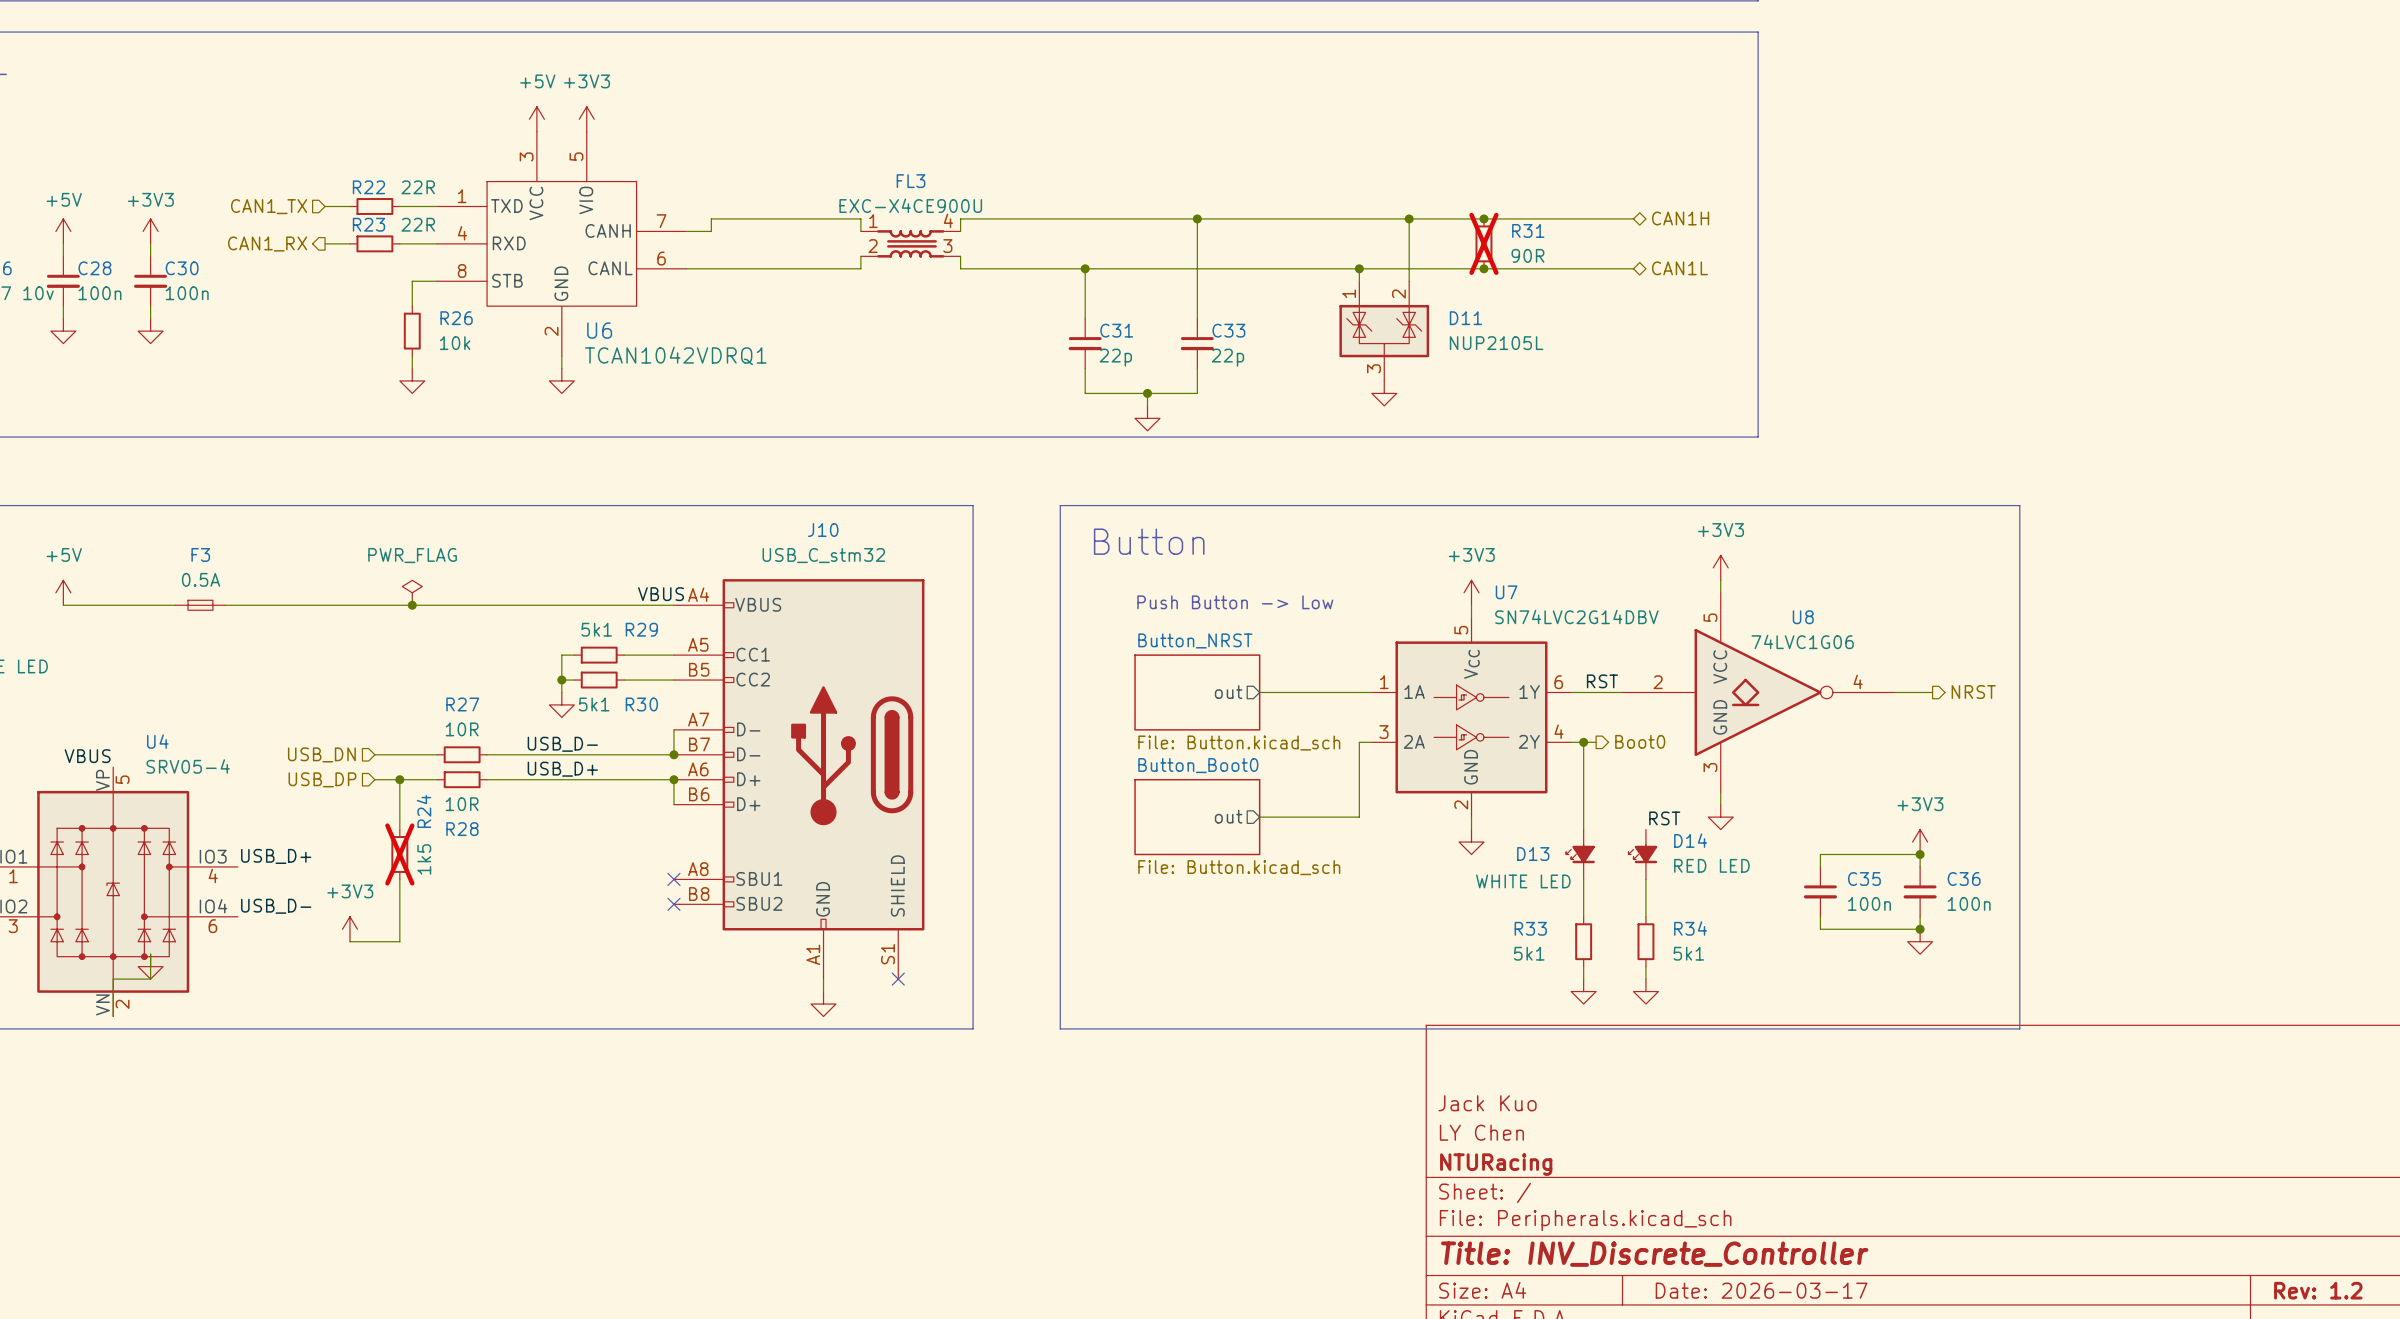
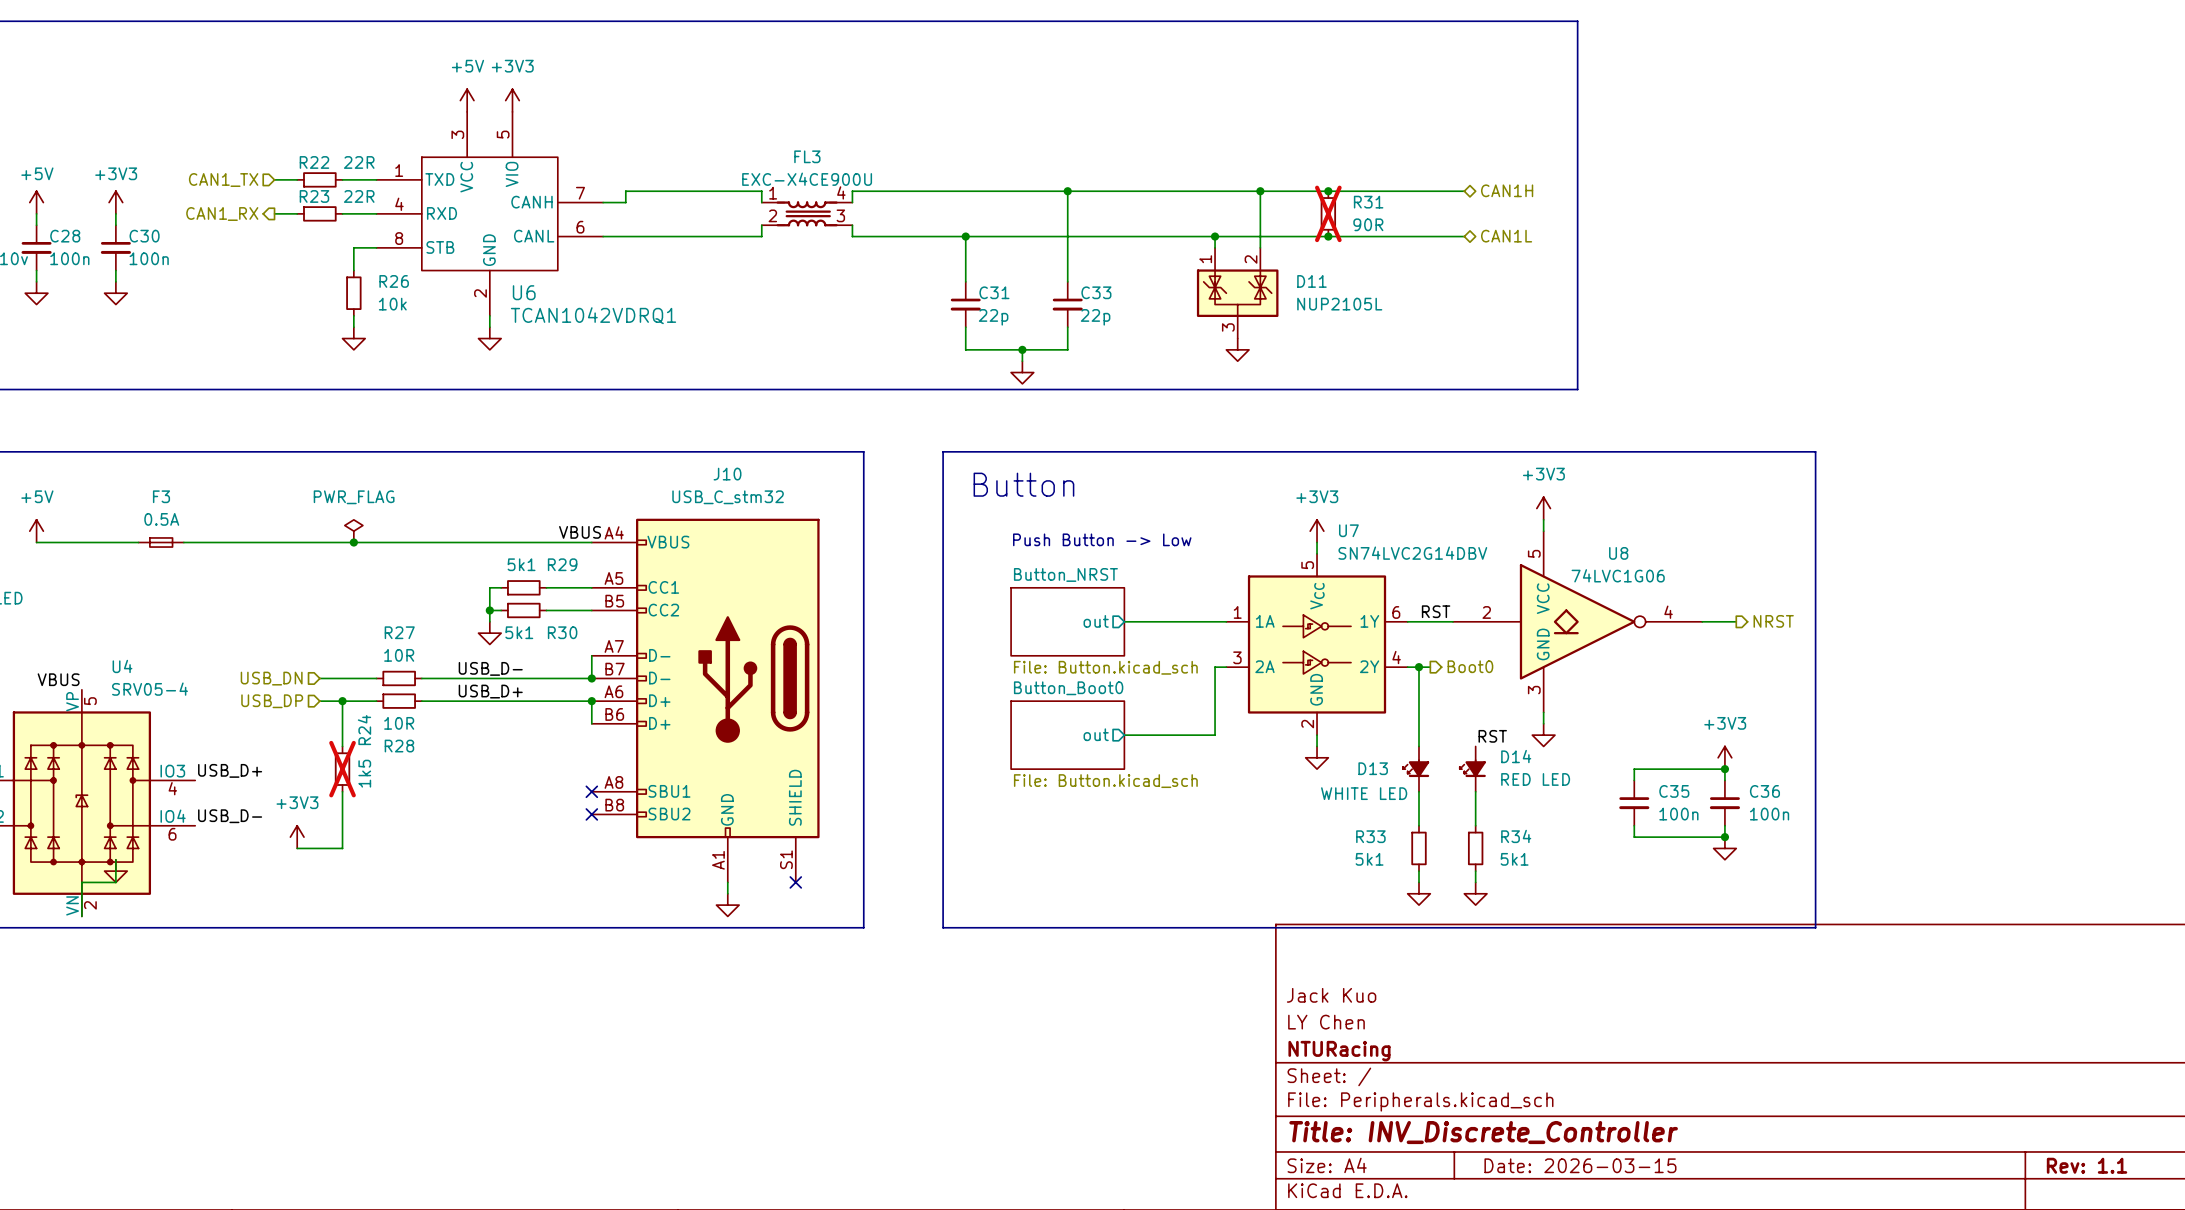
title block: Date: 2026-03-17 (1761, 1290) -> Date: 2026-03-15 (1580, 1165)
title block: Rev: 1.2 (2318, 1290) -> Rev: 1.1 (2087, 1165)

